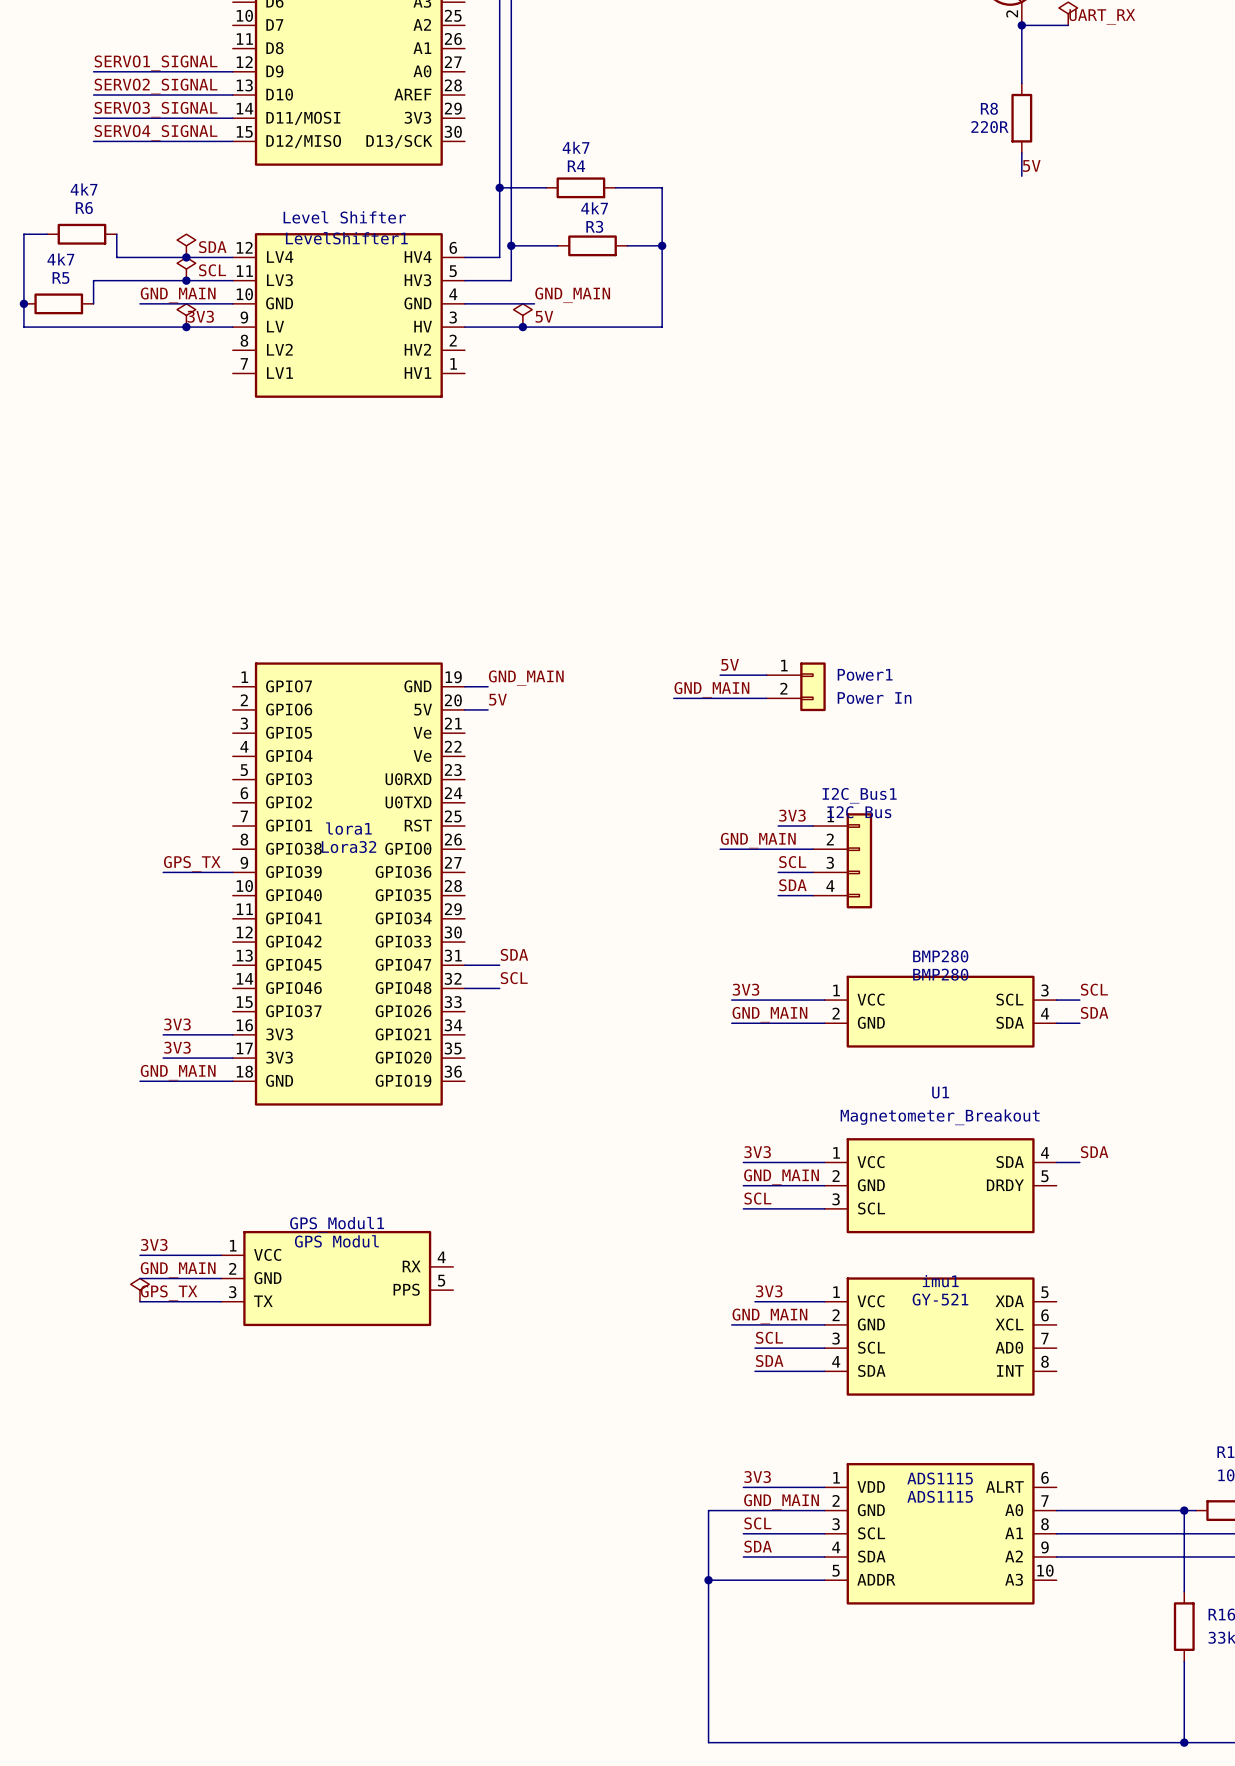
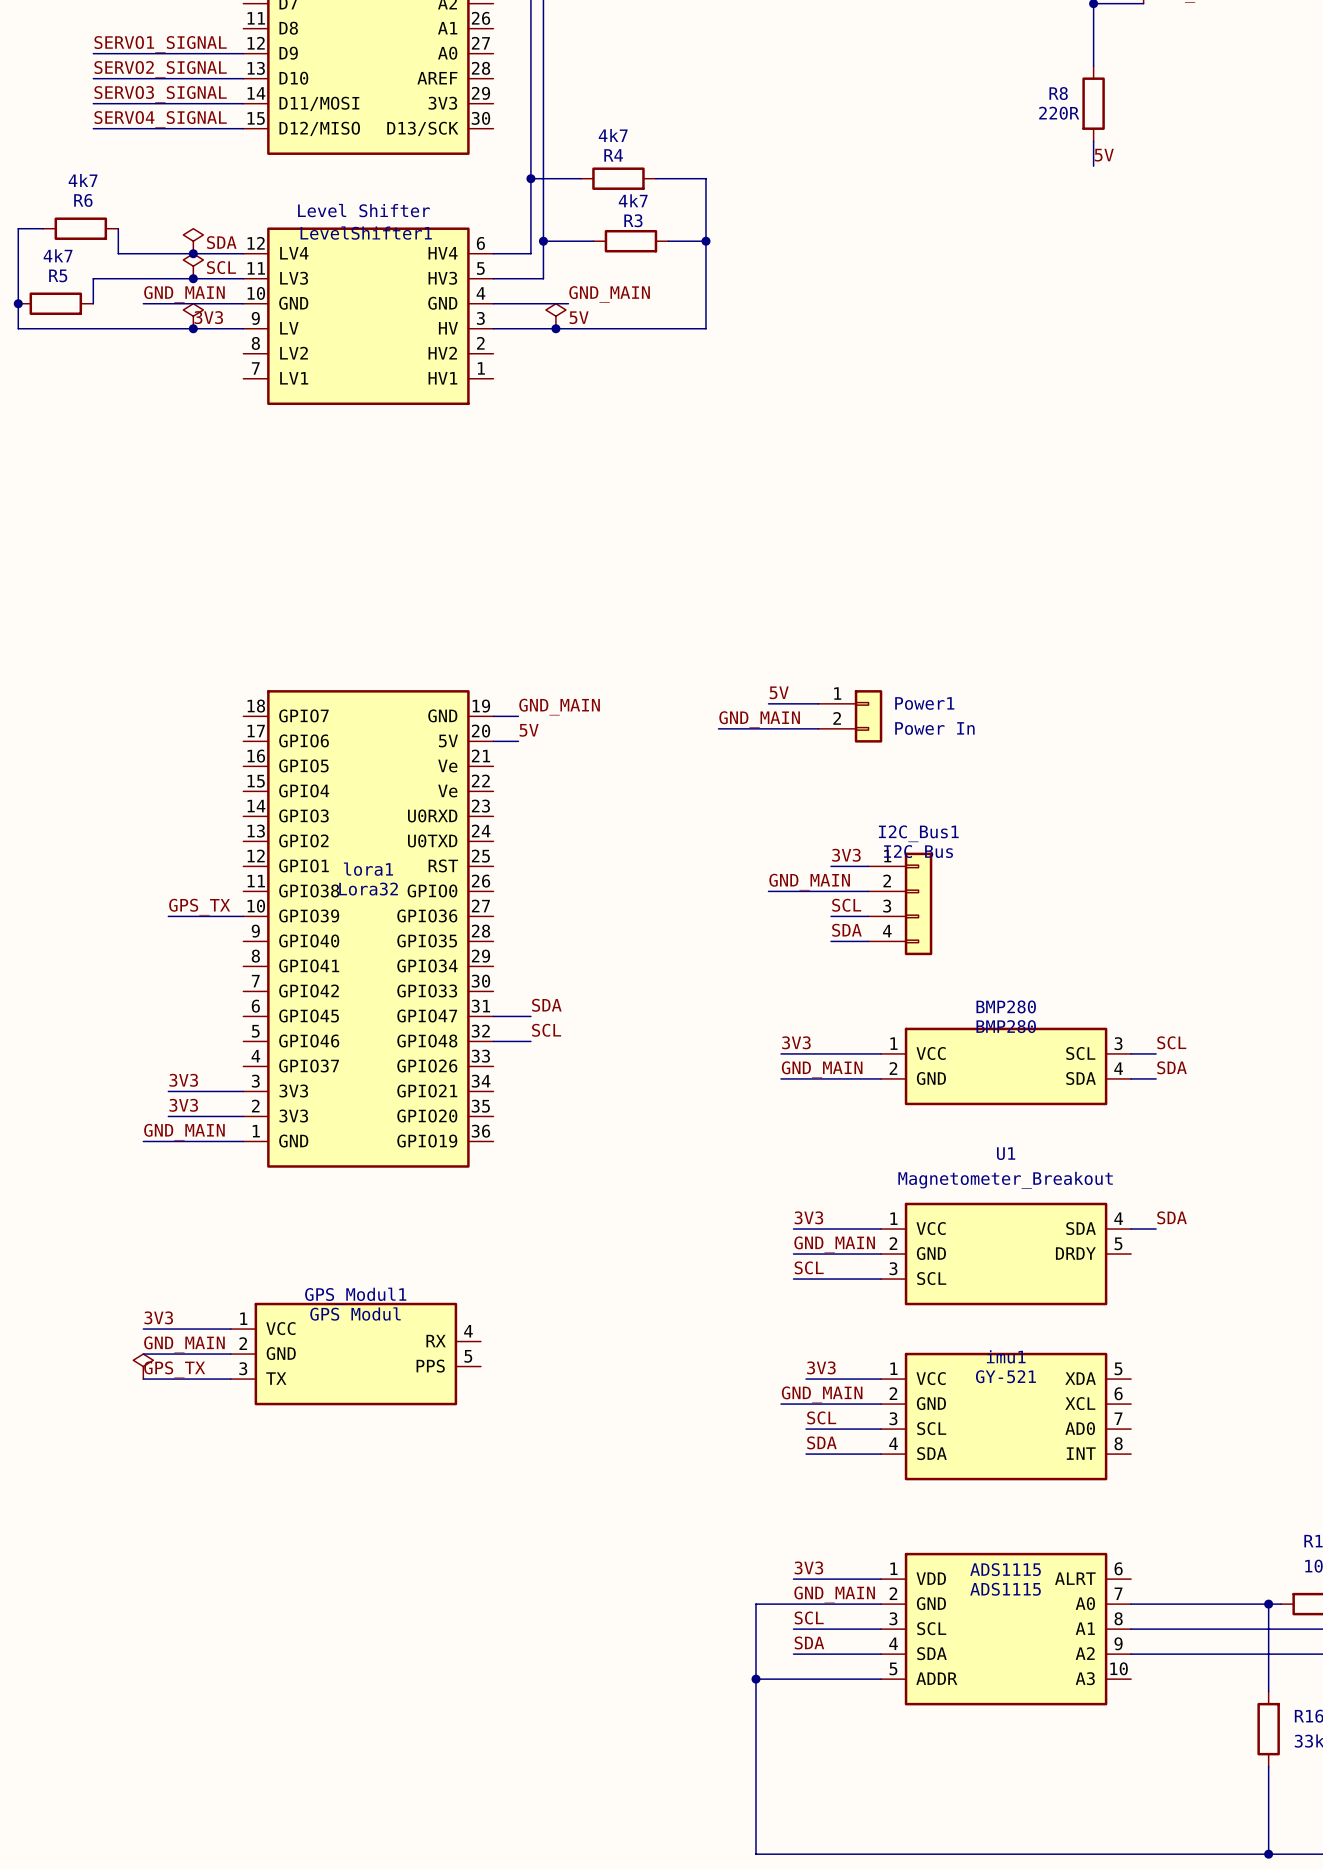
lora1 symbol: [232, 662, 465, 1106] -> [243, 690, 494, 1168]

